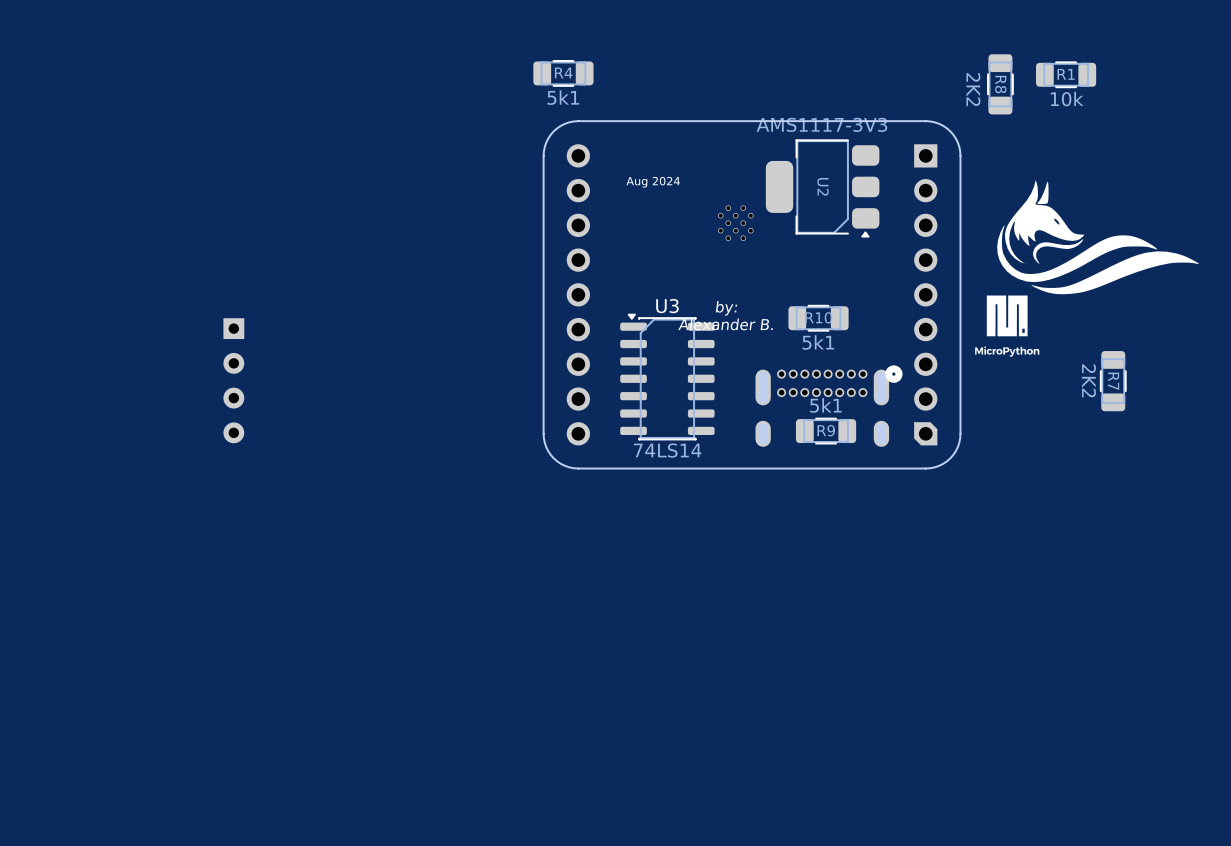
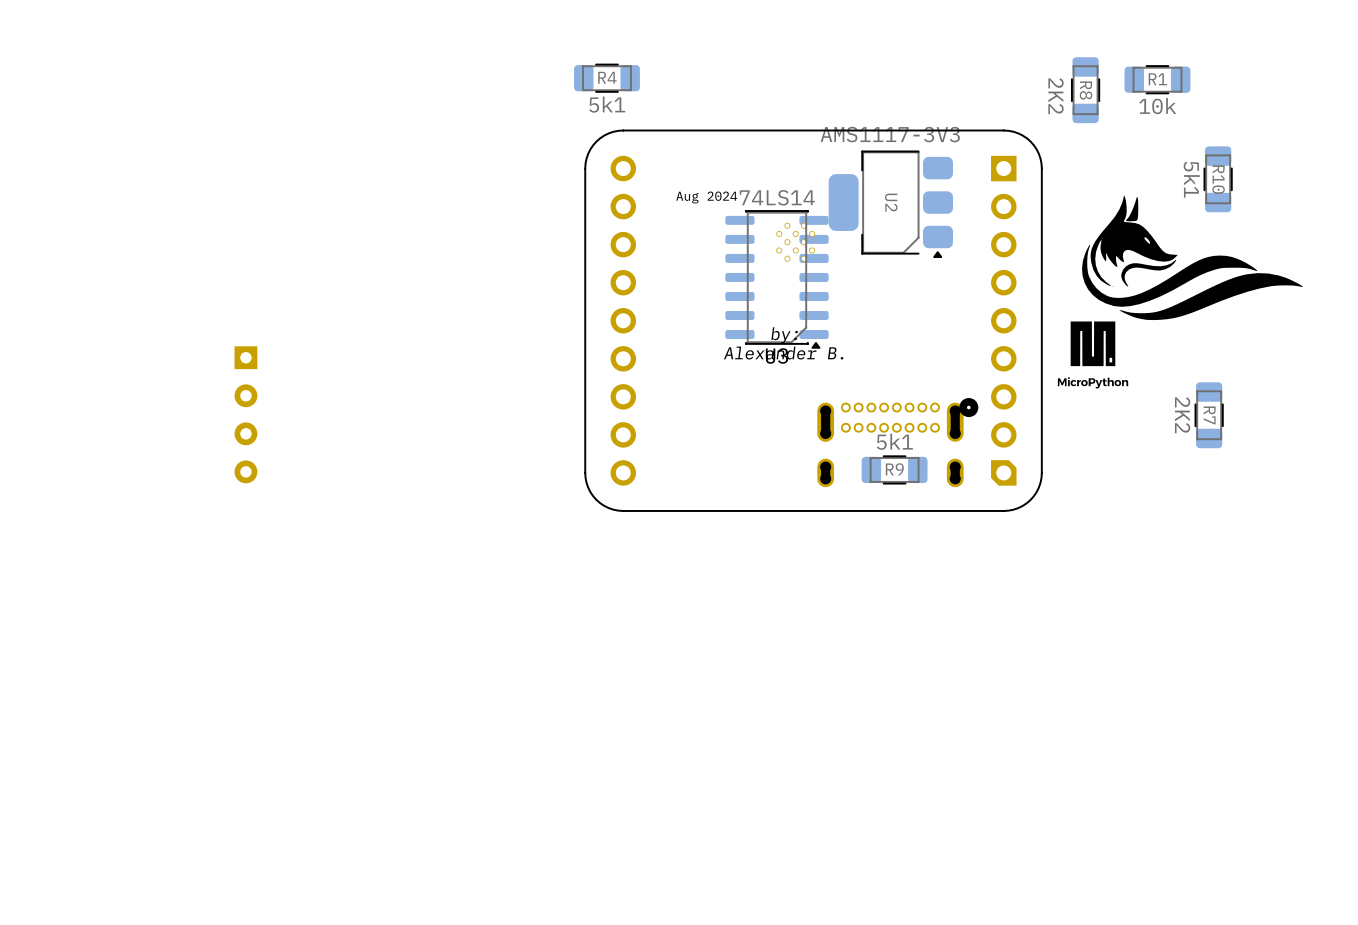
R10 rotation: 0° (818, 318) -> 90° clockwise (1218, 179)
R10 position: (818, 318) -> (1218, 179)
U3 rotation: 0° (667, 376) -> 180° (776, 279)
U3 position: (667, 376) -> (776, 279)

